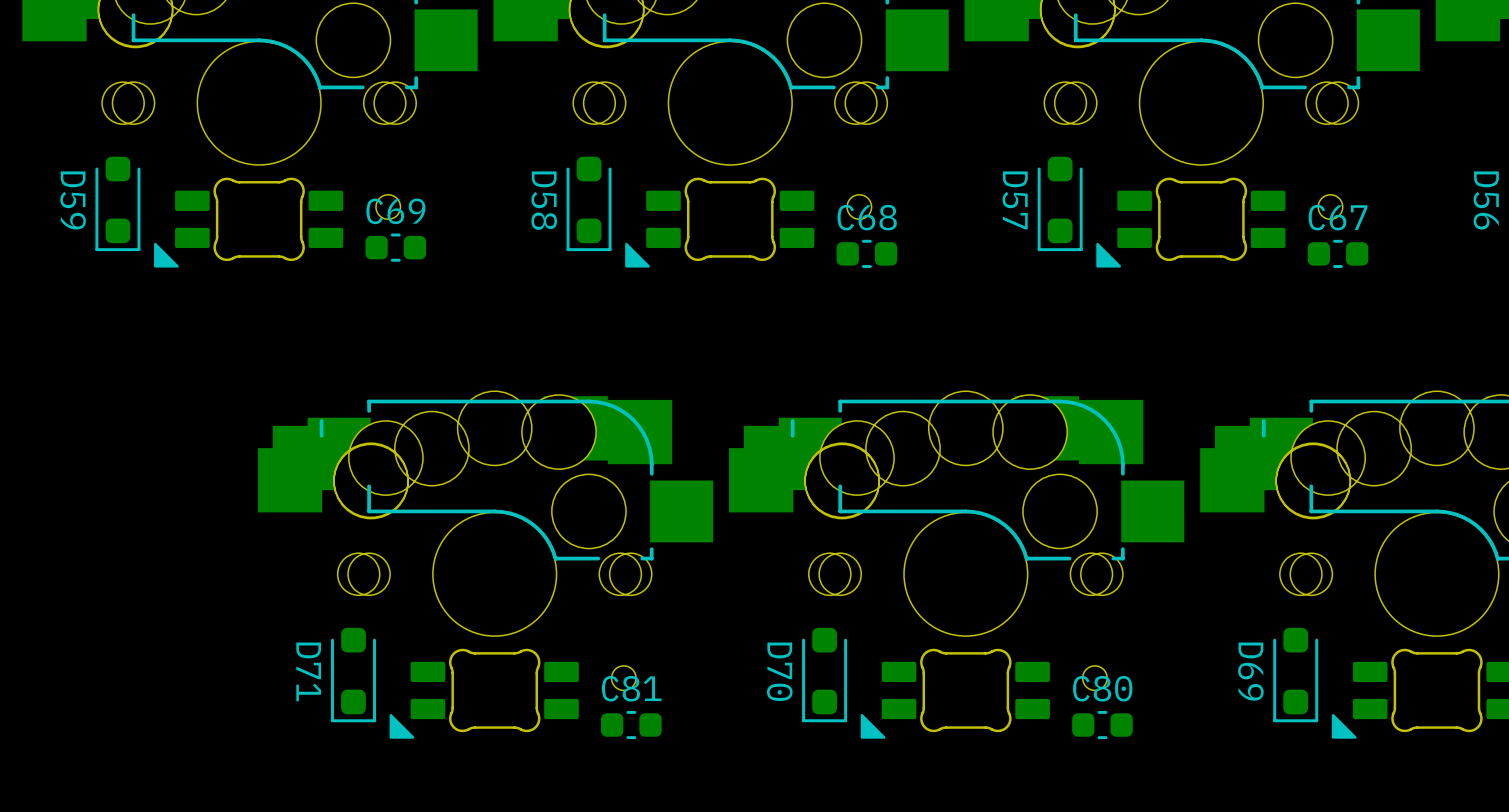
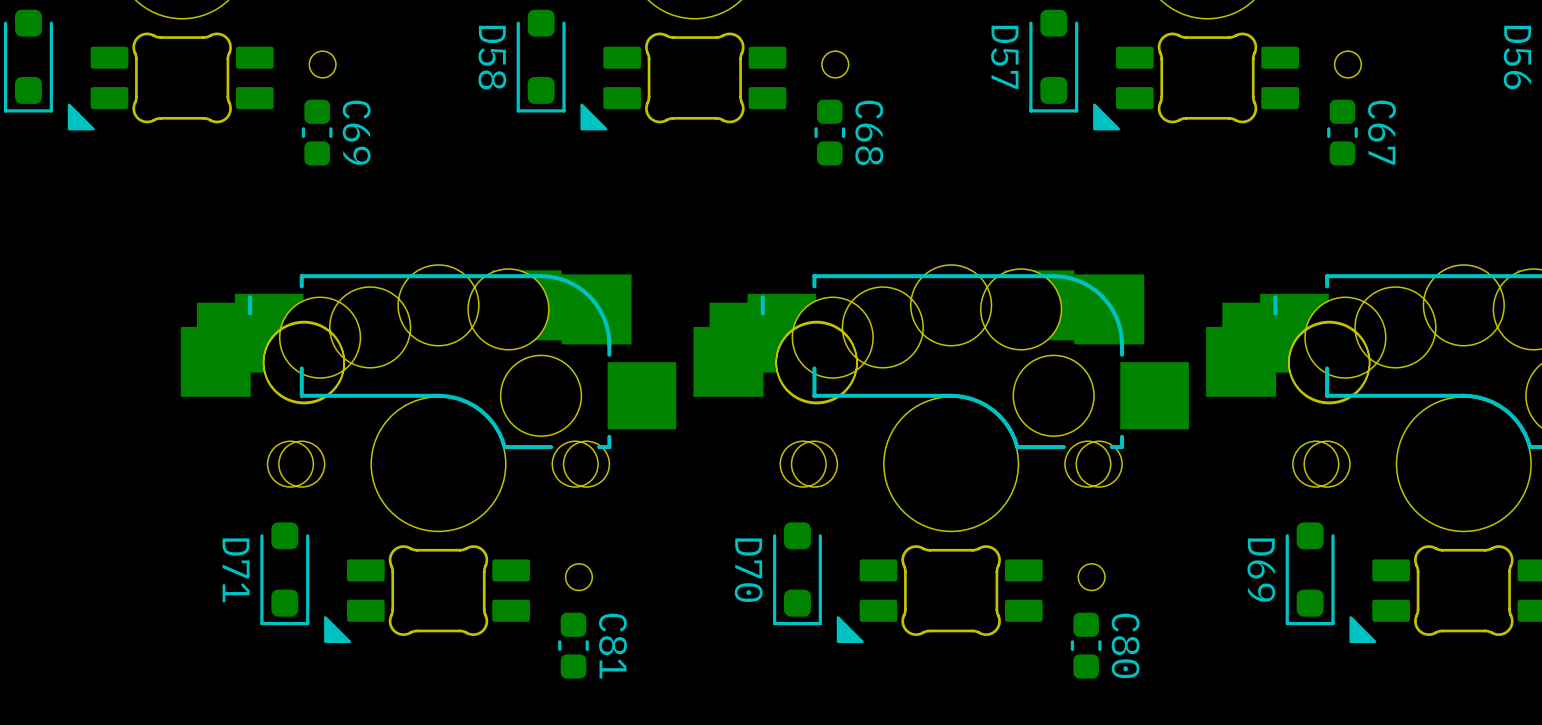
C69 rotation: 0° (395, 247) -> 90° clockwise (317, 132)
C68 rotation: 0° (866, 253) -> 90° clockwise (829, 132)
C67 rotation: 0° (1338, 253) -> 90° clockwise (1342, 132)
C81 rotation: 0° (631, 725) -> 90° clockwise (573, 645)
C80 rotation: 0° (1102, 725) -> 90° clockwise (1086, 645)

